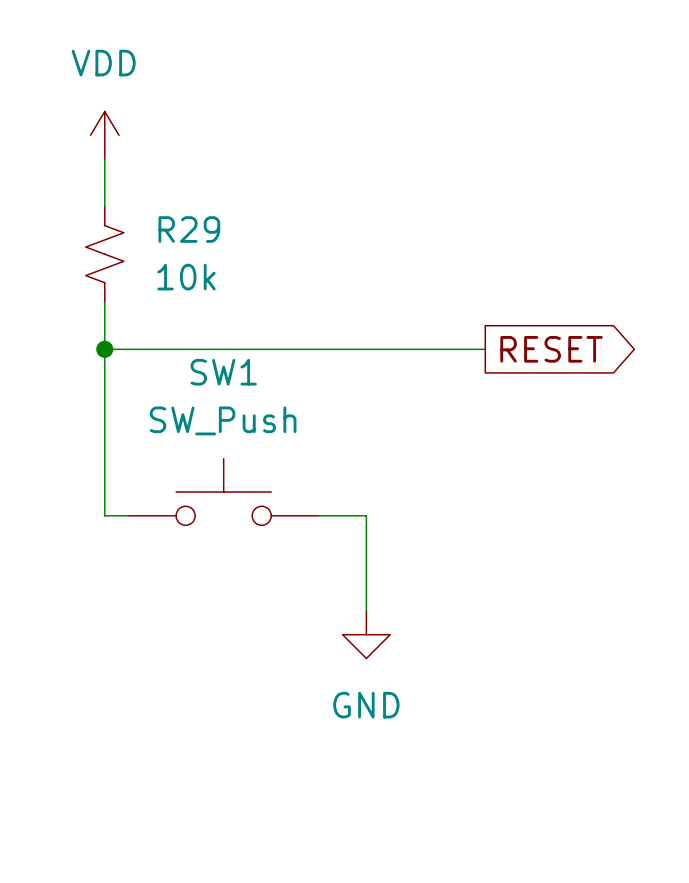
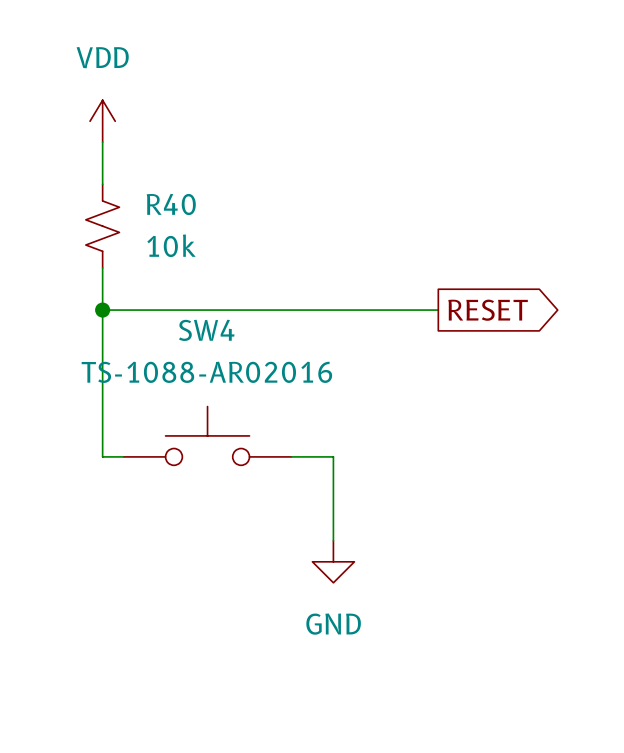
R29 name: R29 (189, 229) -> R40 (171, 204)
SW1 name: SW1 (223, 372) -> SW4 (206, 330)
SW1 value: SW_Push (223, 420) -> TS-1088-AR02016 (206, 372)

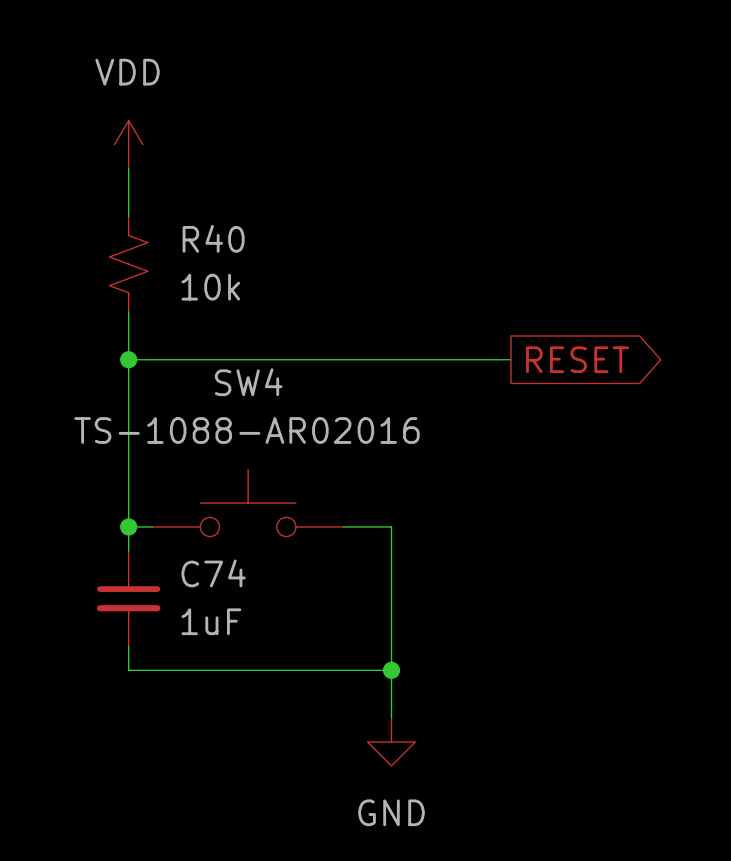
wire: none -> (128, 526) (128, 550)
junction: none -> (128, 526)
C74: none -> 1uF (128, 598)
wire: none -> (391, 622) (391, 718)
wire: none -> (128, 646) (128, 670) (391, 670)
power symbol position: GND (333, 561) -> GND (391, 742)
junction: none -> (391, 670)

